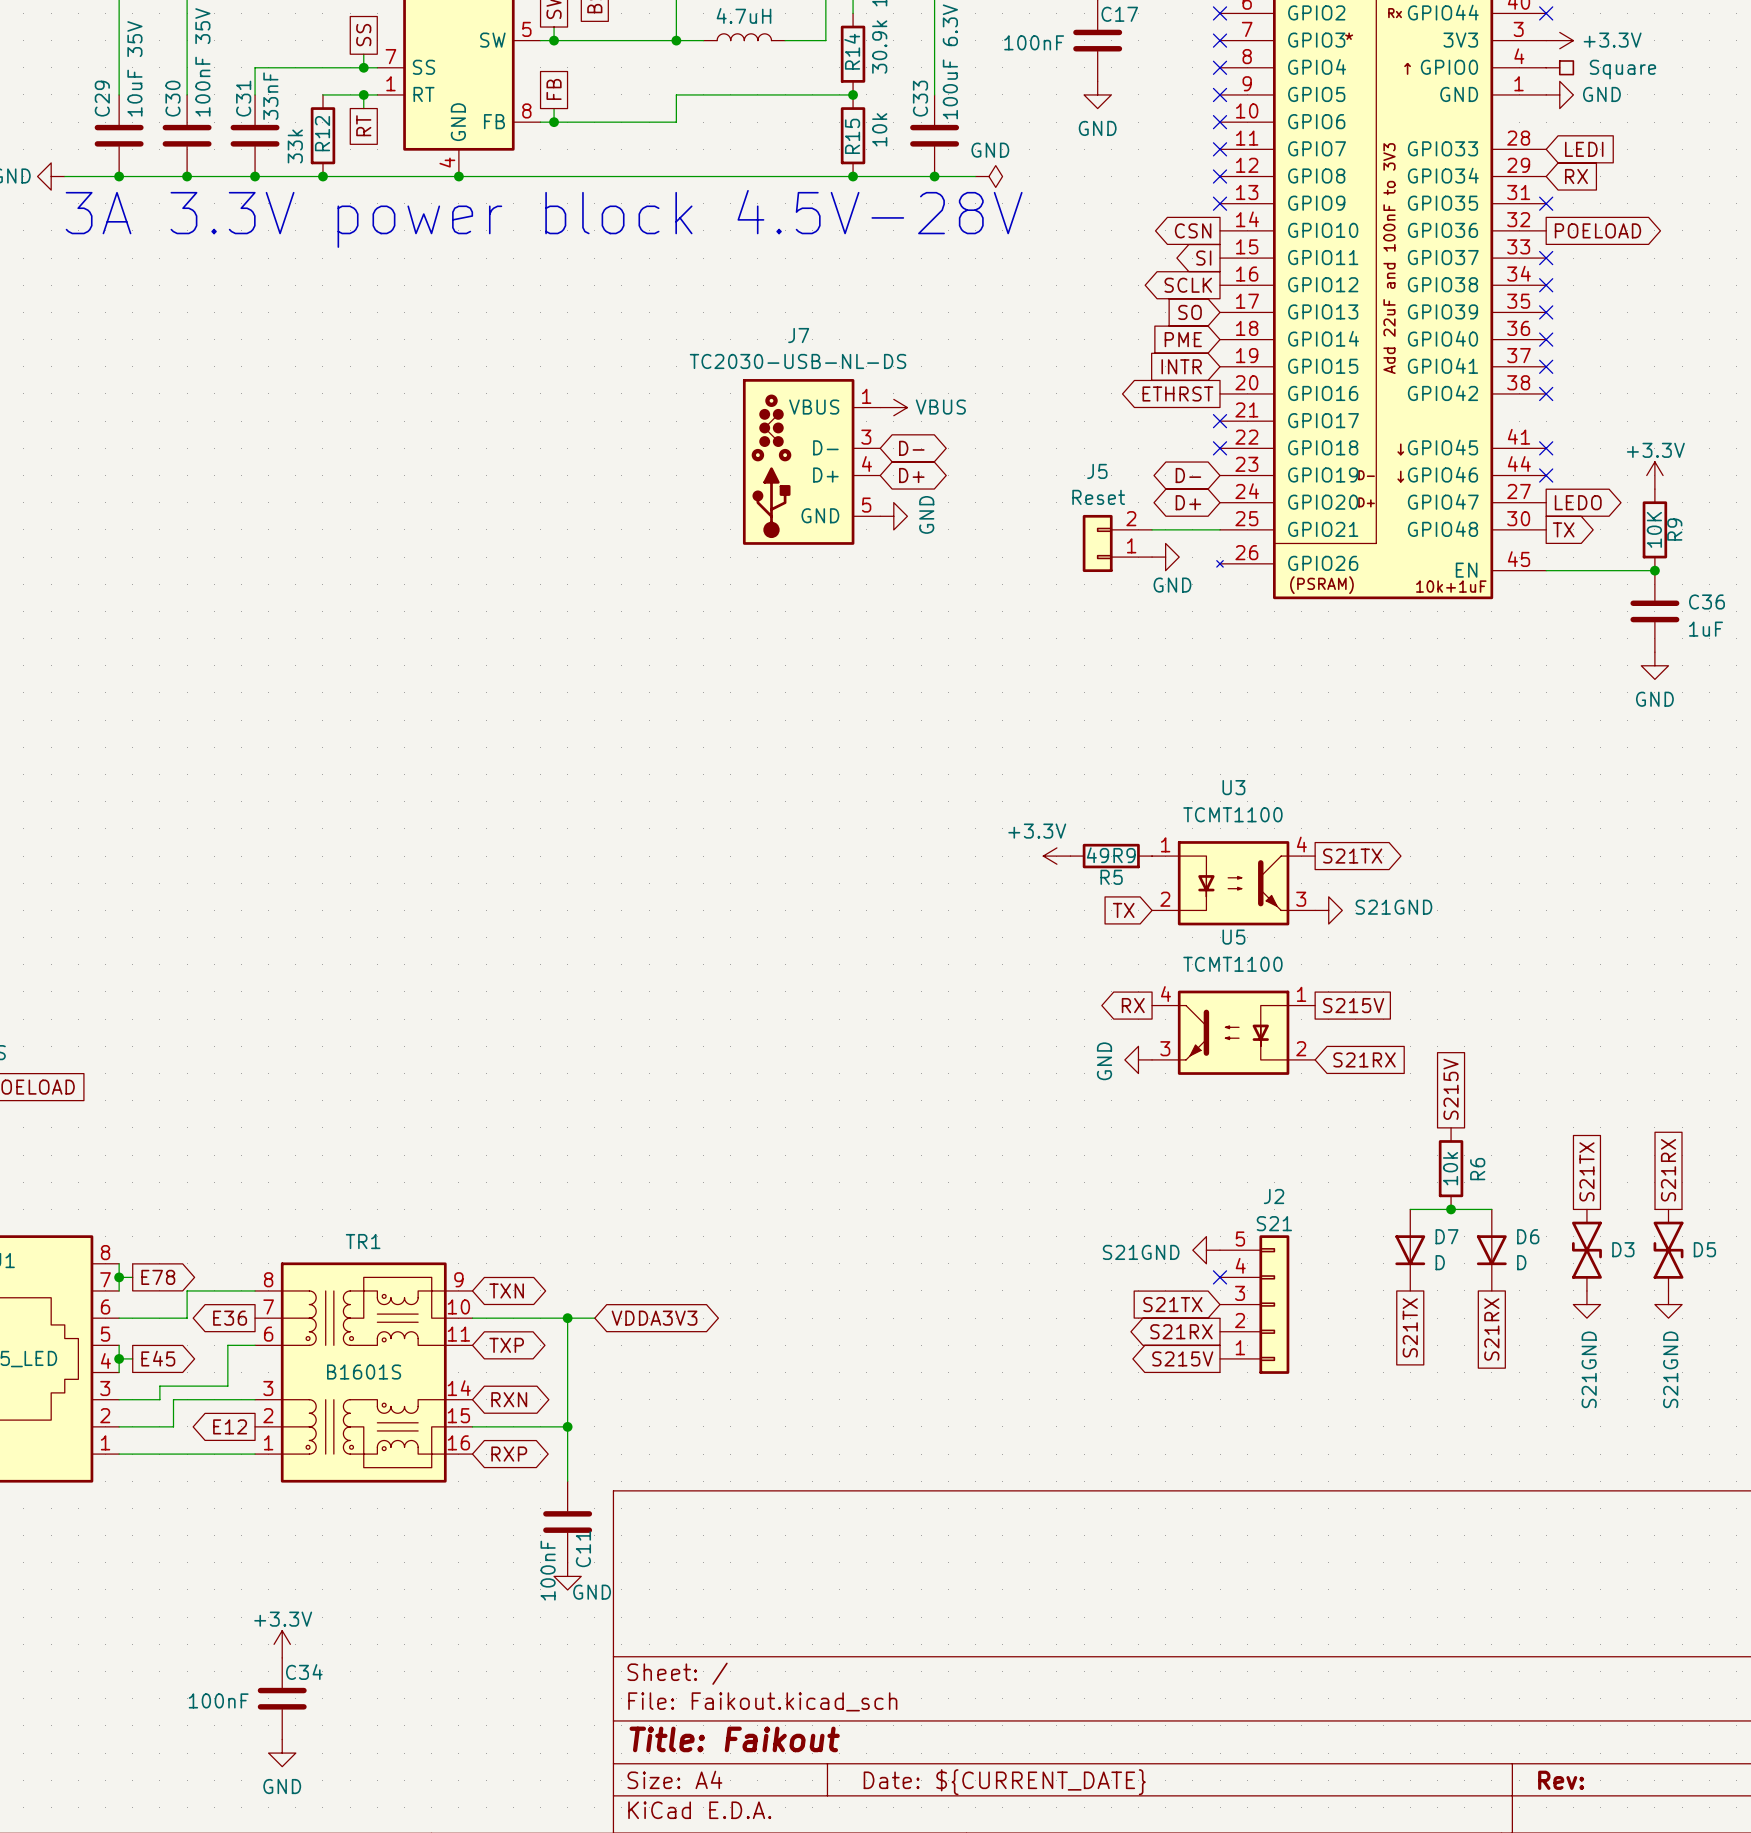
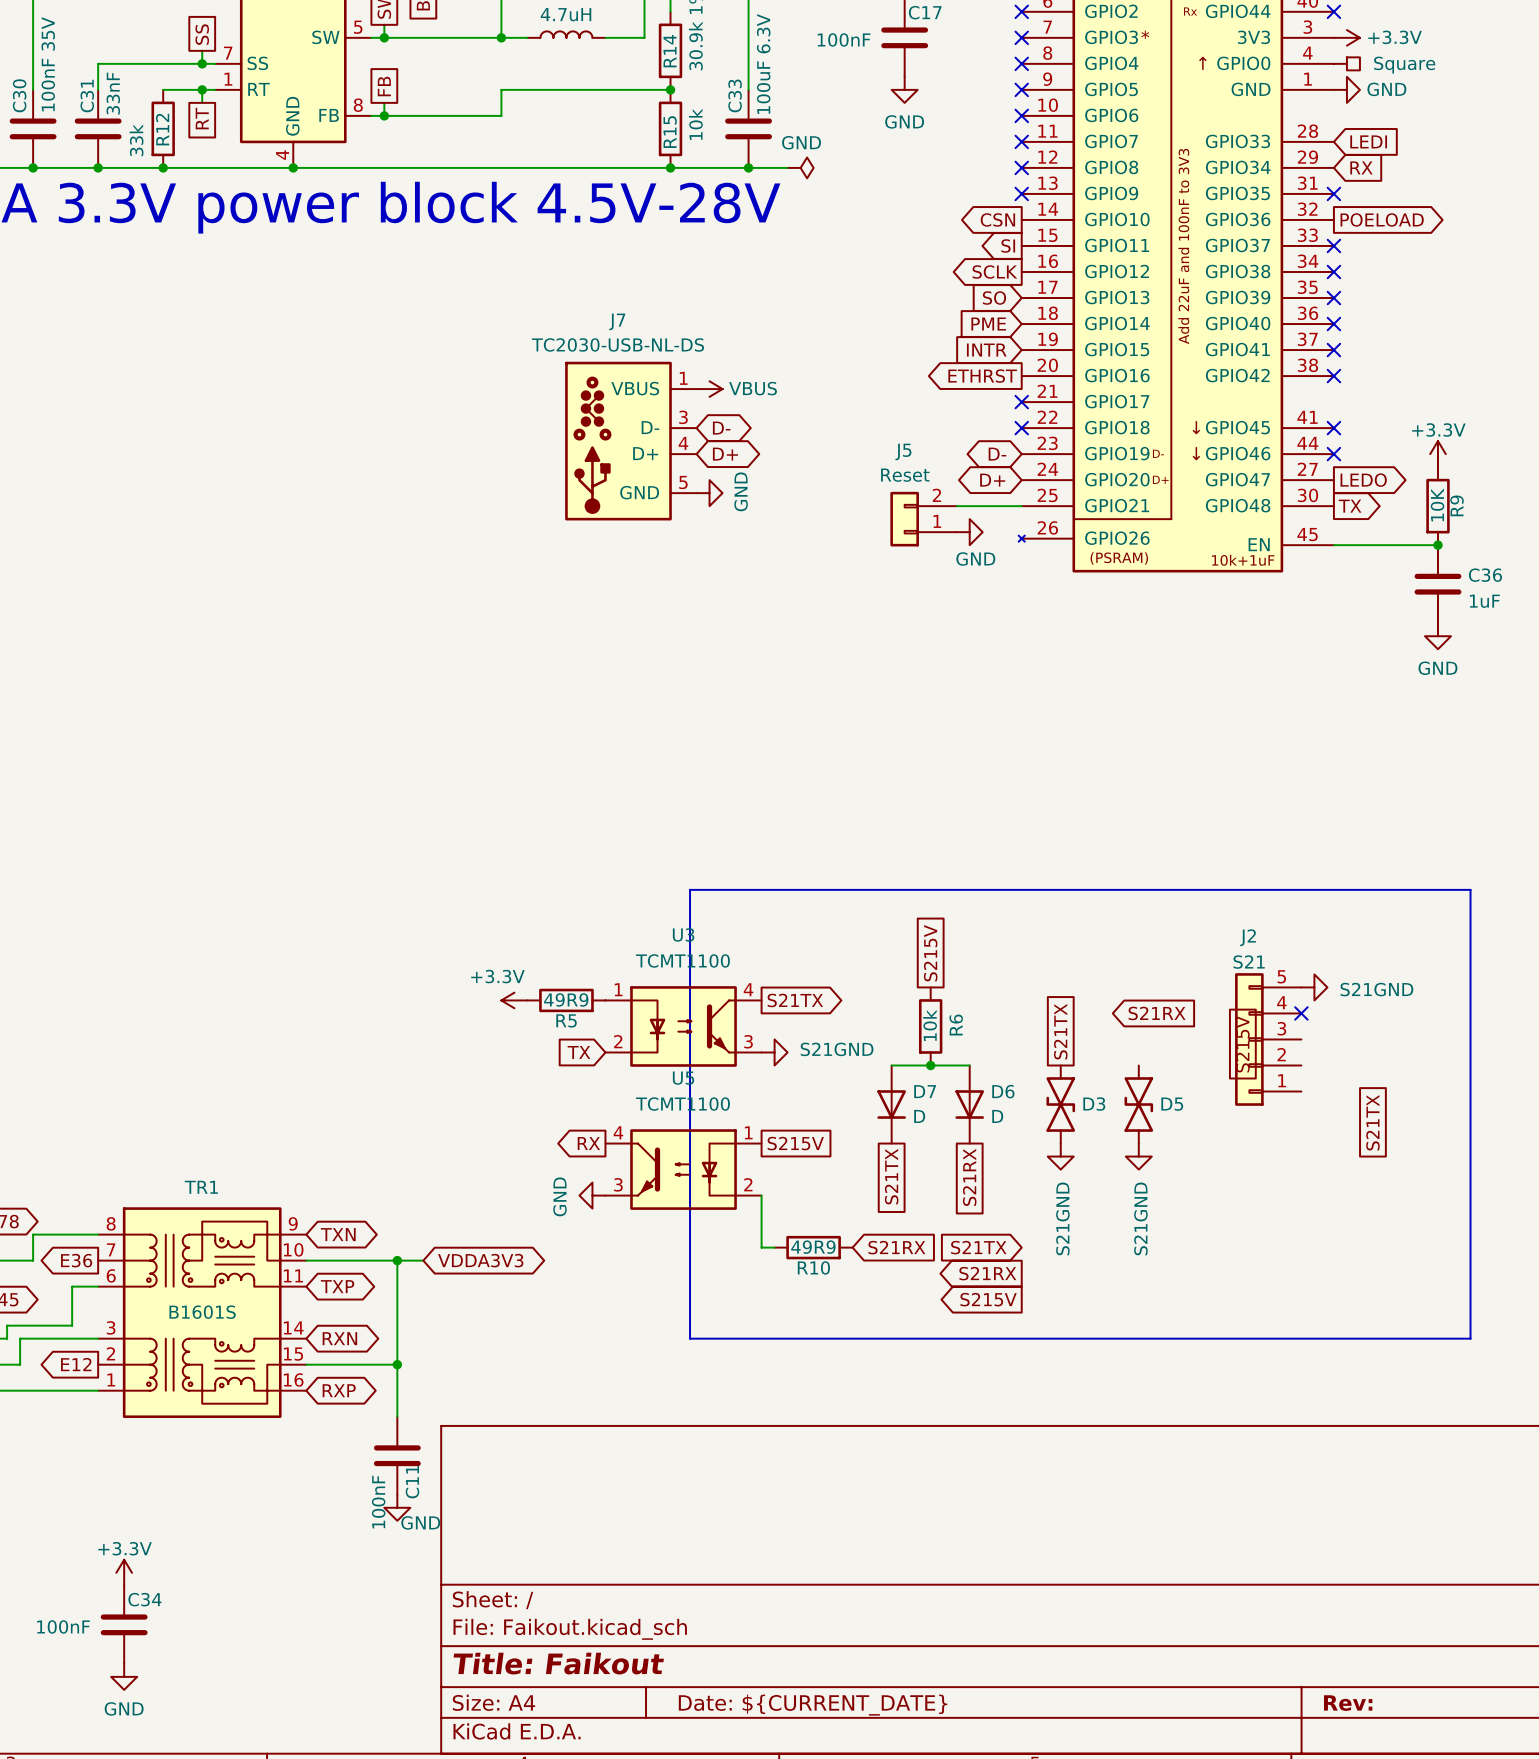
power symbol: +3.3V (1056, 856) -> none
R5 position: (1111, 856) -> (566, 1000)
global label: S21TX (1352, 856) -> none
U3 position: (1233, 883) -> (683, 1026)
global label: TX (1123, 910) -> none
power symbol: S21GND (1328, 910) -> none
line: none -> (690, 889) (1470, 889) (1470, 1338) (690, 1338) (690, 889)
global label: RX (1133, 1005) -> none
global label rotation: 0° (1353, 1005) -> 90° counterclockwise (930, 953)
global label position: S215V (1353, 1005) -> S215V (930, 953)
U5 position: (1233, 1032) -> (683, 1169)
power symbol: none -> S21GND (1314, 987)
power symbol: none -> +3.3V (514, 1000)
global label: none -> S21TX (795, 1000)
power symbol: GND (1138, 1059) -> none
no-connect mark: none -> (1301, 1013)
global label: none -> S21TX (1060, 1031)
global label: none -> TX (578, 1052)
power symbol: none -> S21GND (774, 1052)
wire: none -> (891, 1065) (969, 1065)
junction: none -> (930, 1065)
R6 position: (1451, 1168) -> (930, 1026)
global label: S21RX (1668, 1170) -> none
global label: none -> RX (588, 1143)
global label: none -> S215V (795, 1143)
power symbol: none -> S21GND (1138, 1156)
wire: (1410, 1209) (1491, 1209) -> none
junction: (1451, 1209) -> none
global label: none -> S21TX (891, 1176)
global label: none -> S21RX (969, 1177)
power symbol: none -> GND (592, 1195)
wire: none -> (761, 1195) (761, 1247) (774, 1247)
power symbol rotation: 0° (1206, 1250) -> 90° counterclockwise (1060, 1156)
power symbol position: S21GND (1206, 1250) -> S21GND (1060, 1156)
D7 position: (1410, 1250) -> (891, 1104)
D6 position: (1491, 1250) -> (969, 1104)
D3 position: (1586, 1250) -> (1060, 1104)
D5 position: (1668, 1250) -> (1138, 1104)
no-connect mark: (1220, 1277) -> none
R10: none -> 49R9 (813, 1247)
global label: none -> S21RX (896, 1247)
J2 position: (1254, 1304) -> (1268, 1039)
J2 flip: as is (1274, 1304) -> left-right (1249, 1039)
power symbol: S21GND (1586, 1304) -> none
power symbol: S21GND (1668, 1304) -> none
global label: S21TX (1410, 1327) -> none
global label: S21RX (1491, 1329) -> none

